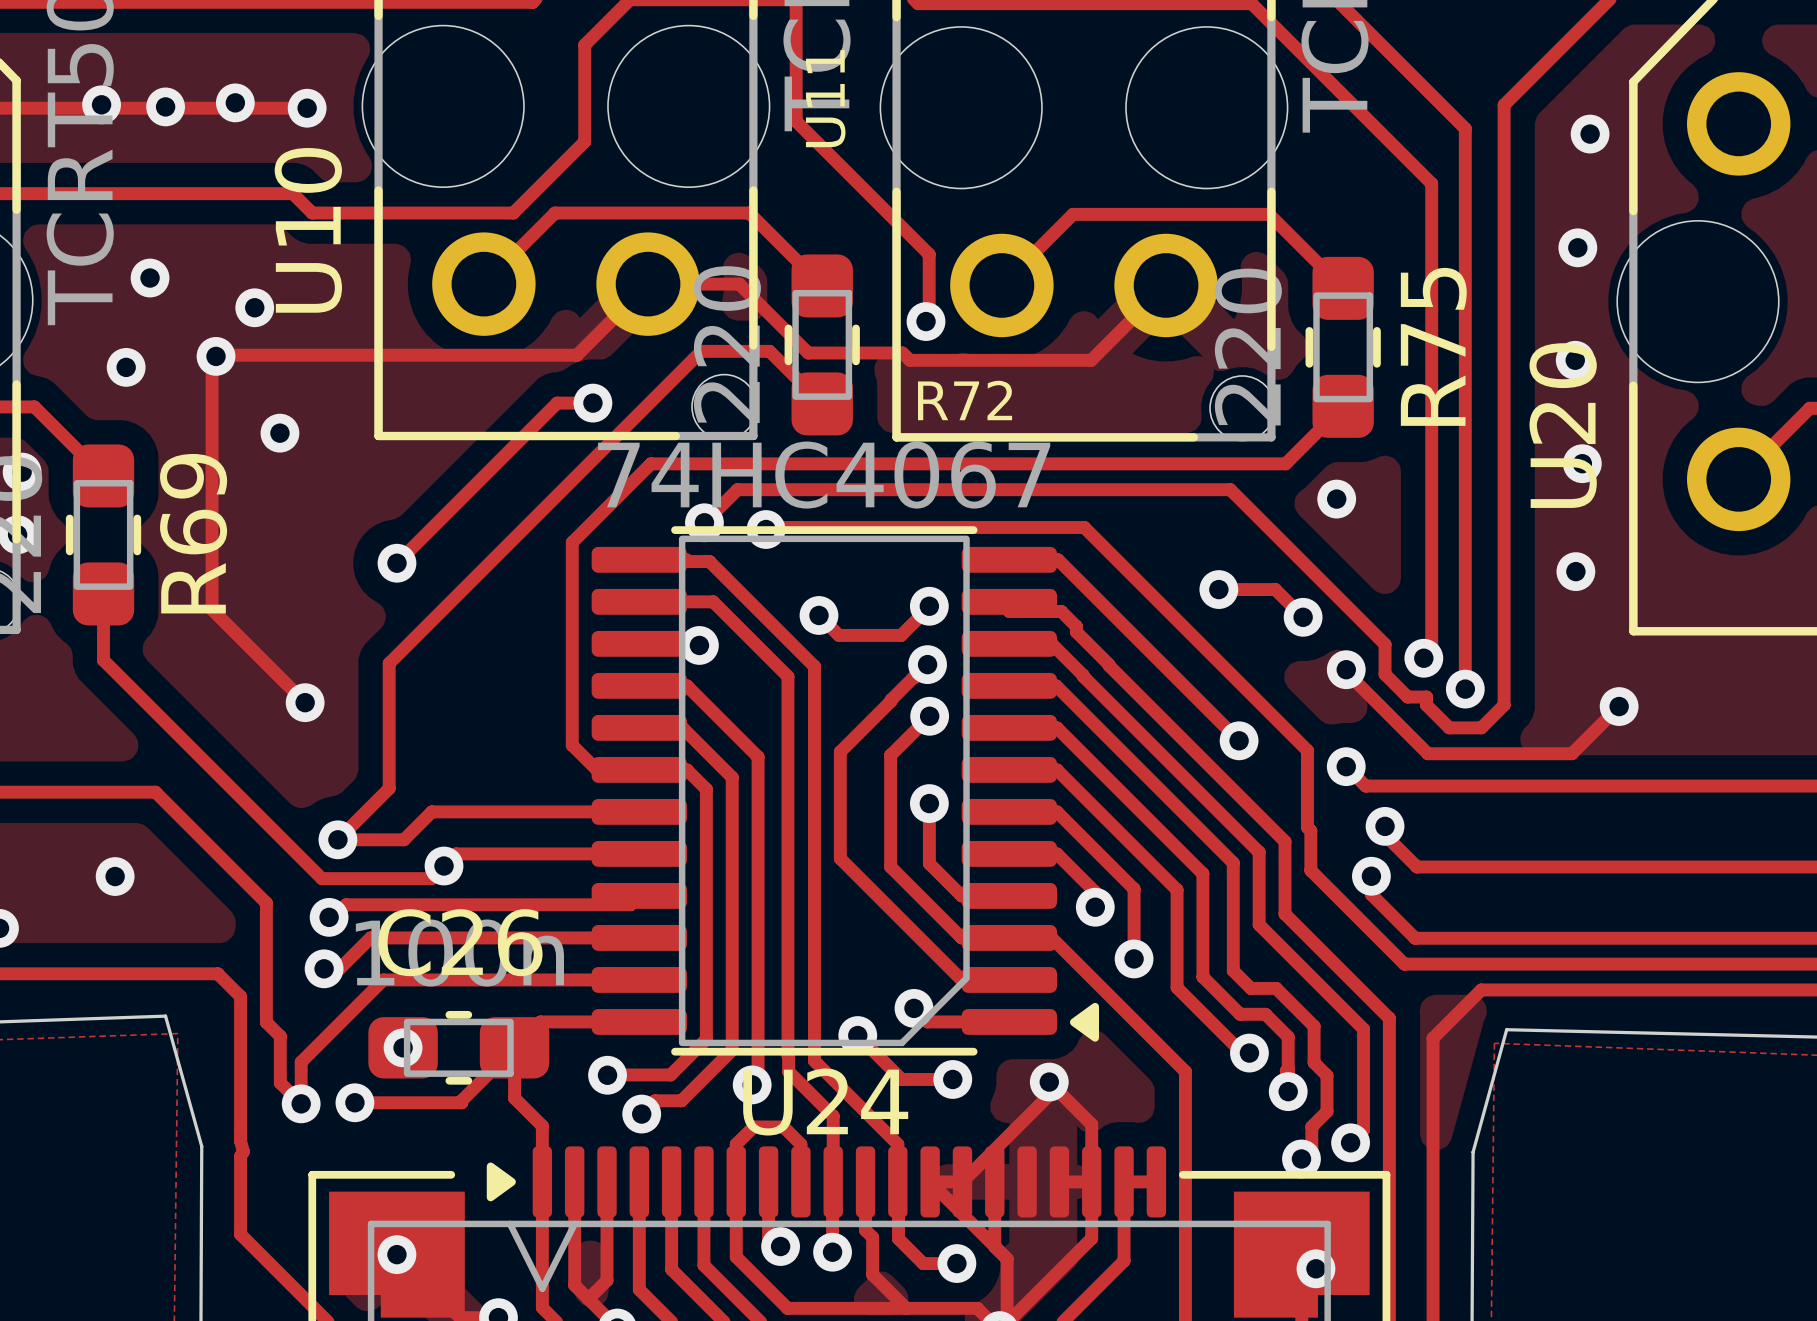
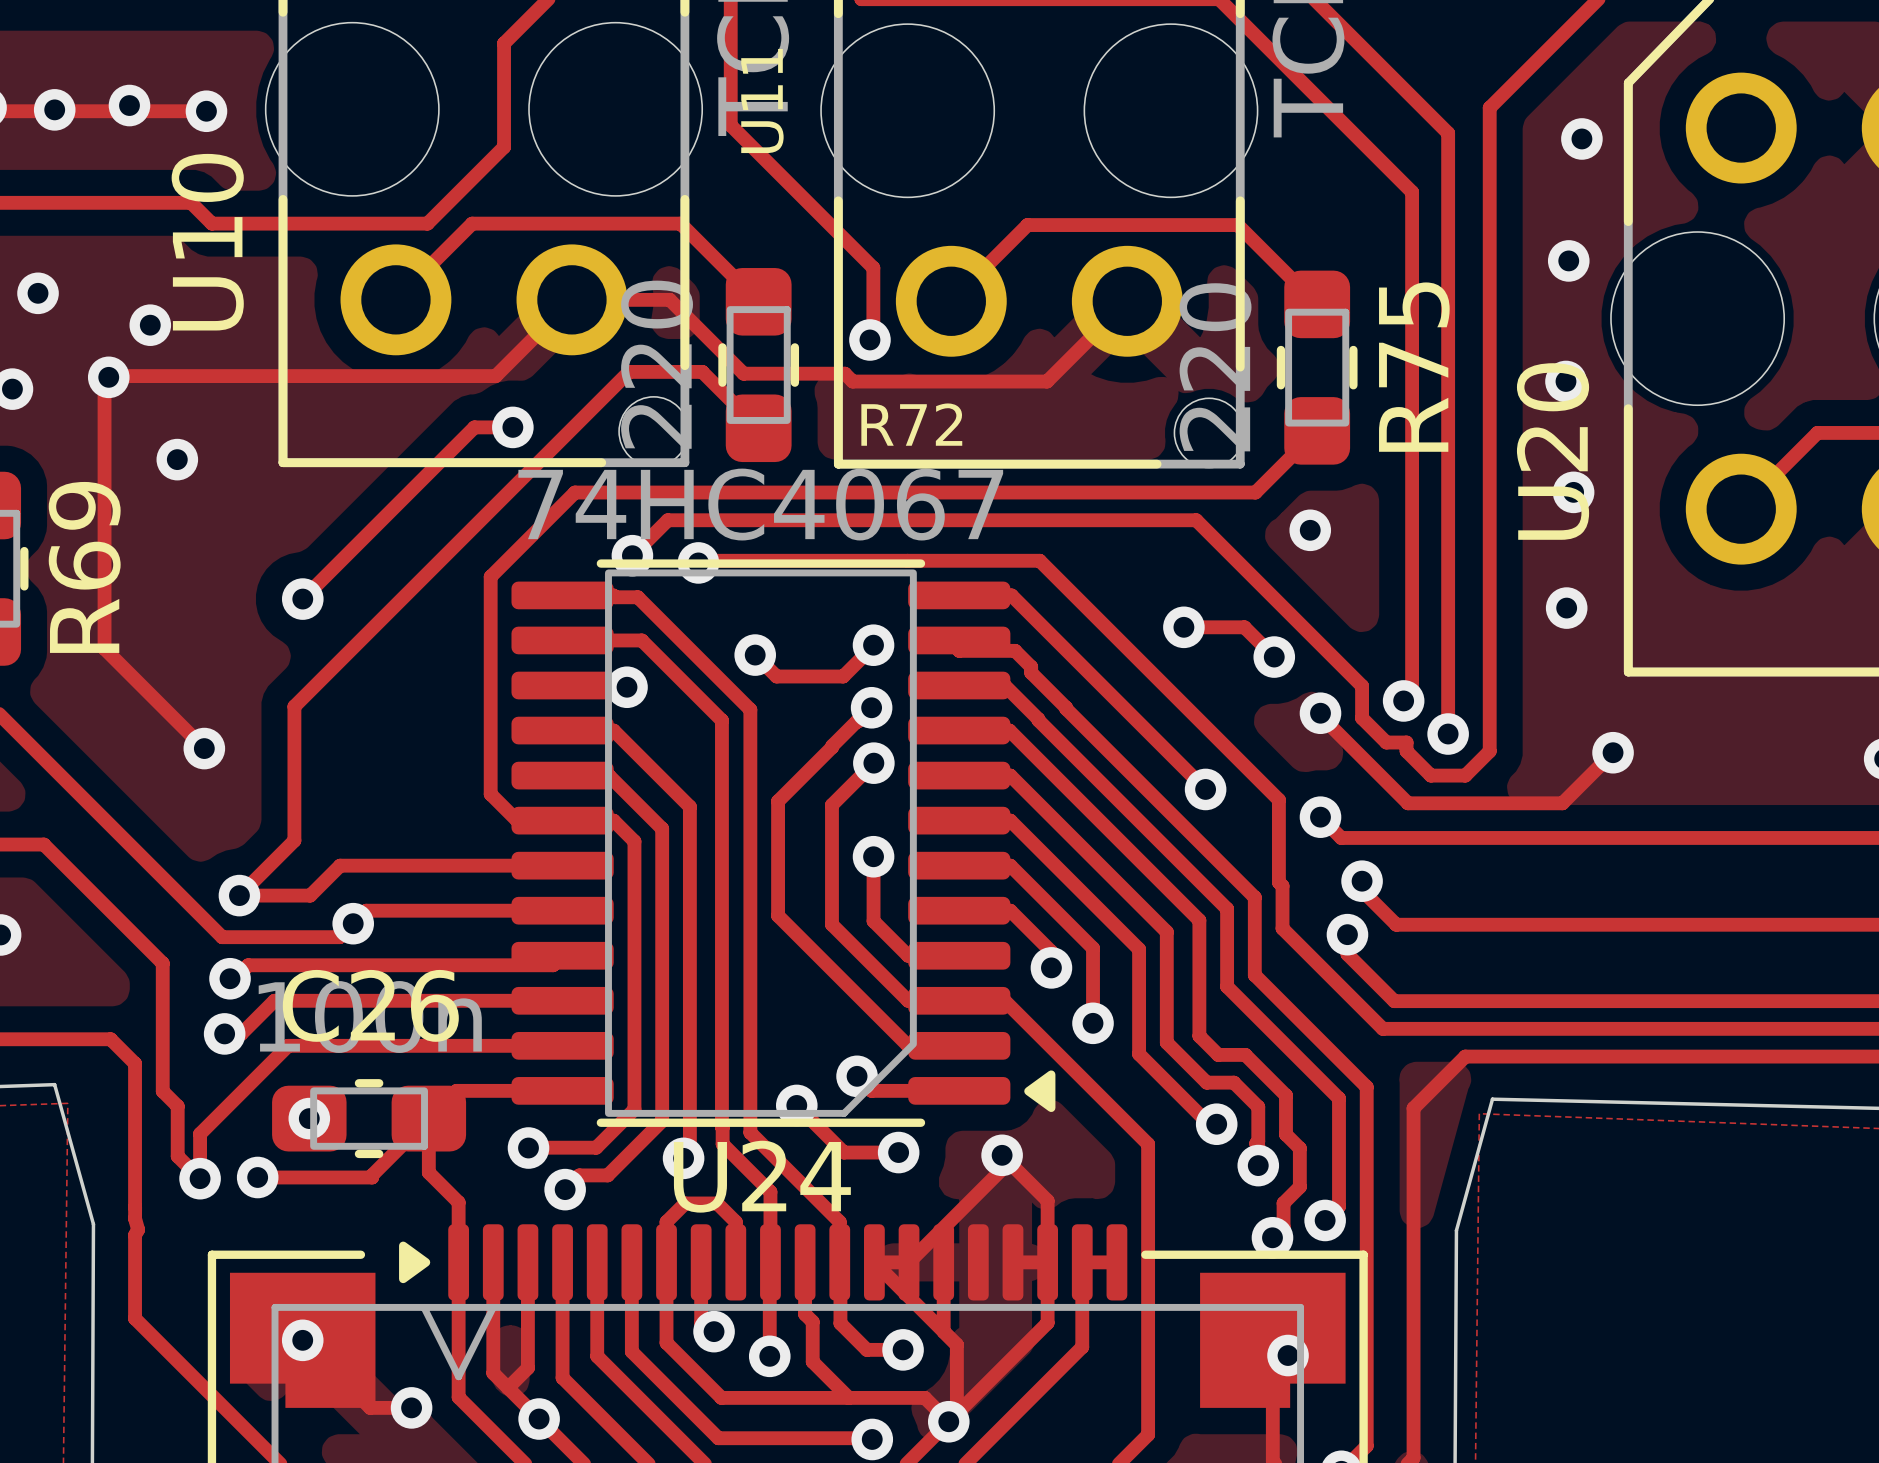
via position: (832, 1252) -> (769, 1356)

